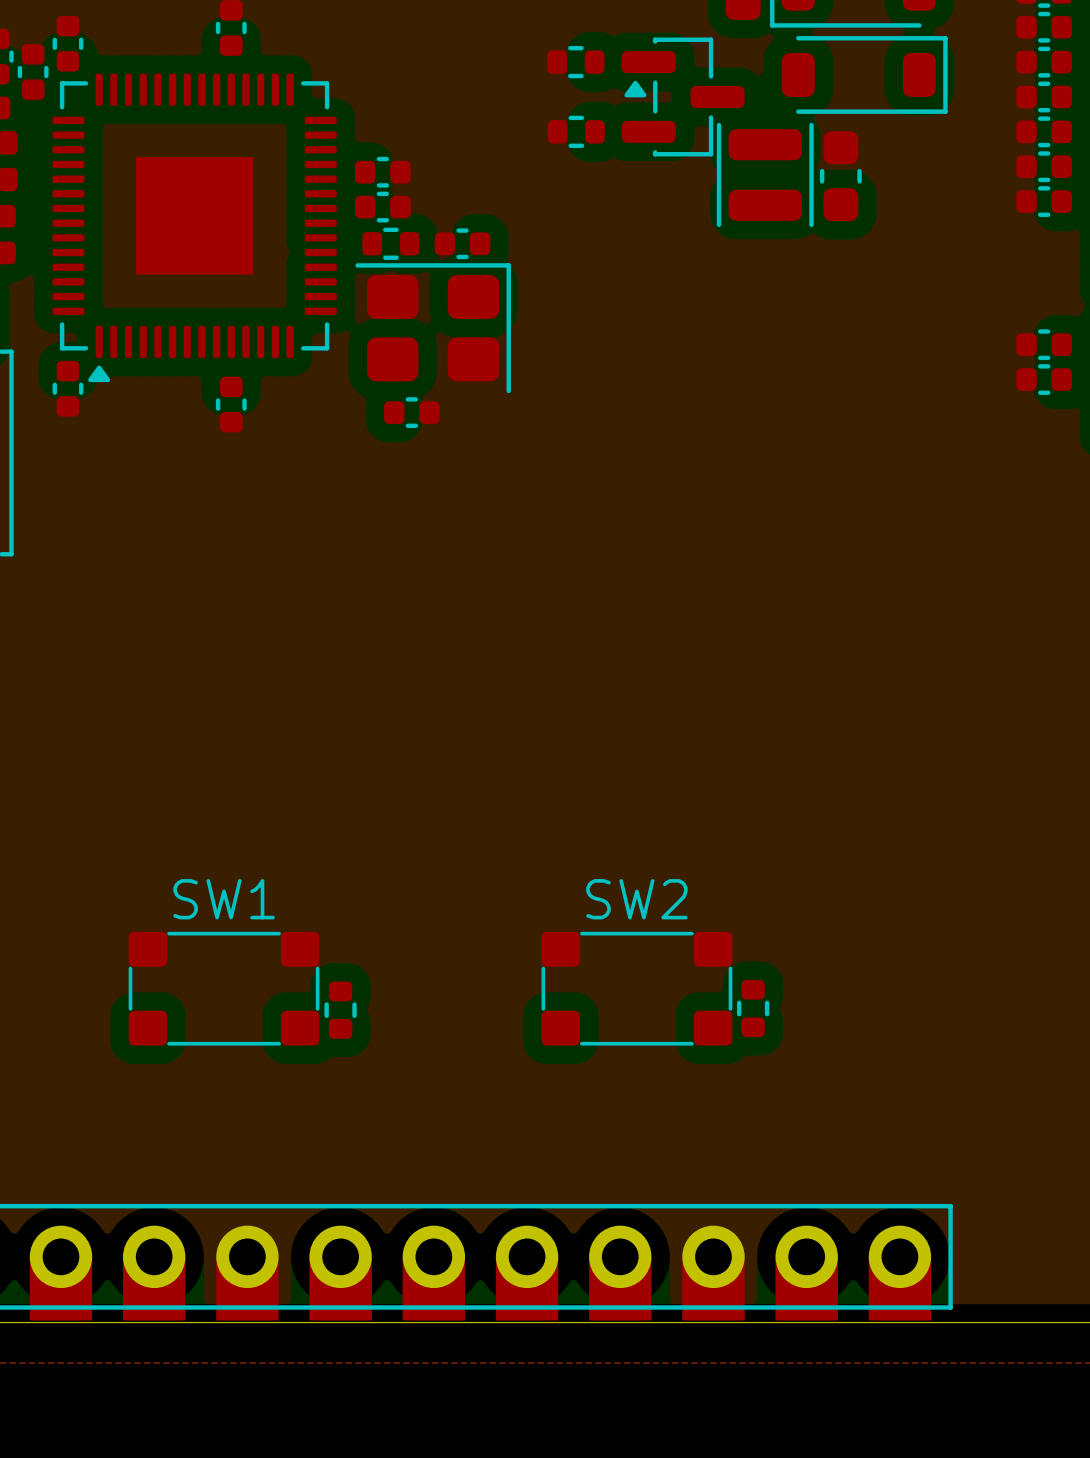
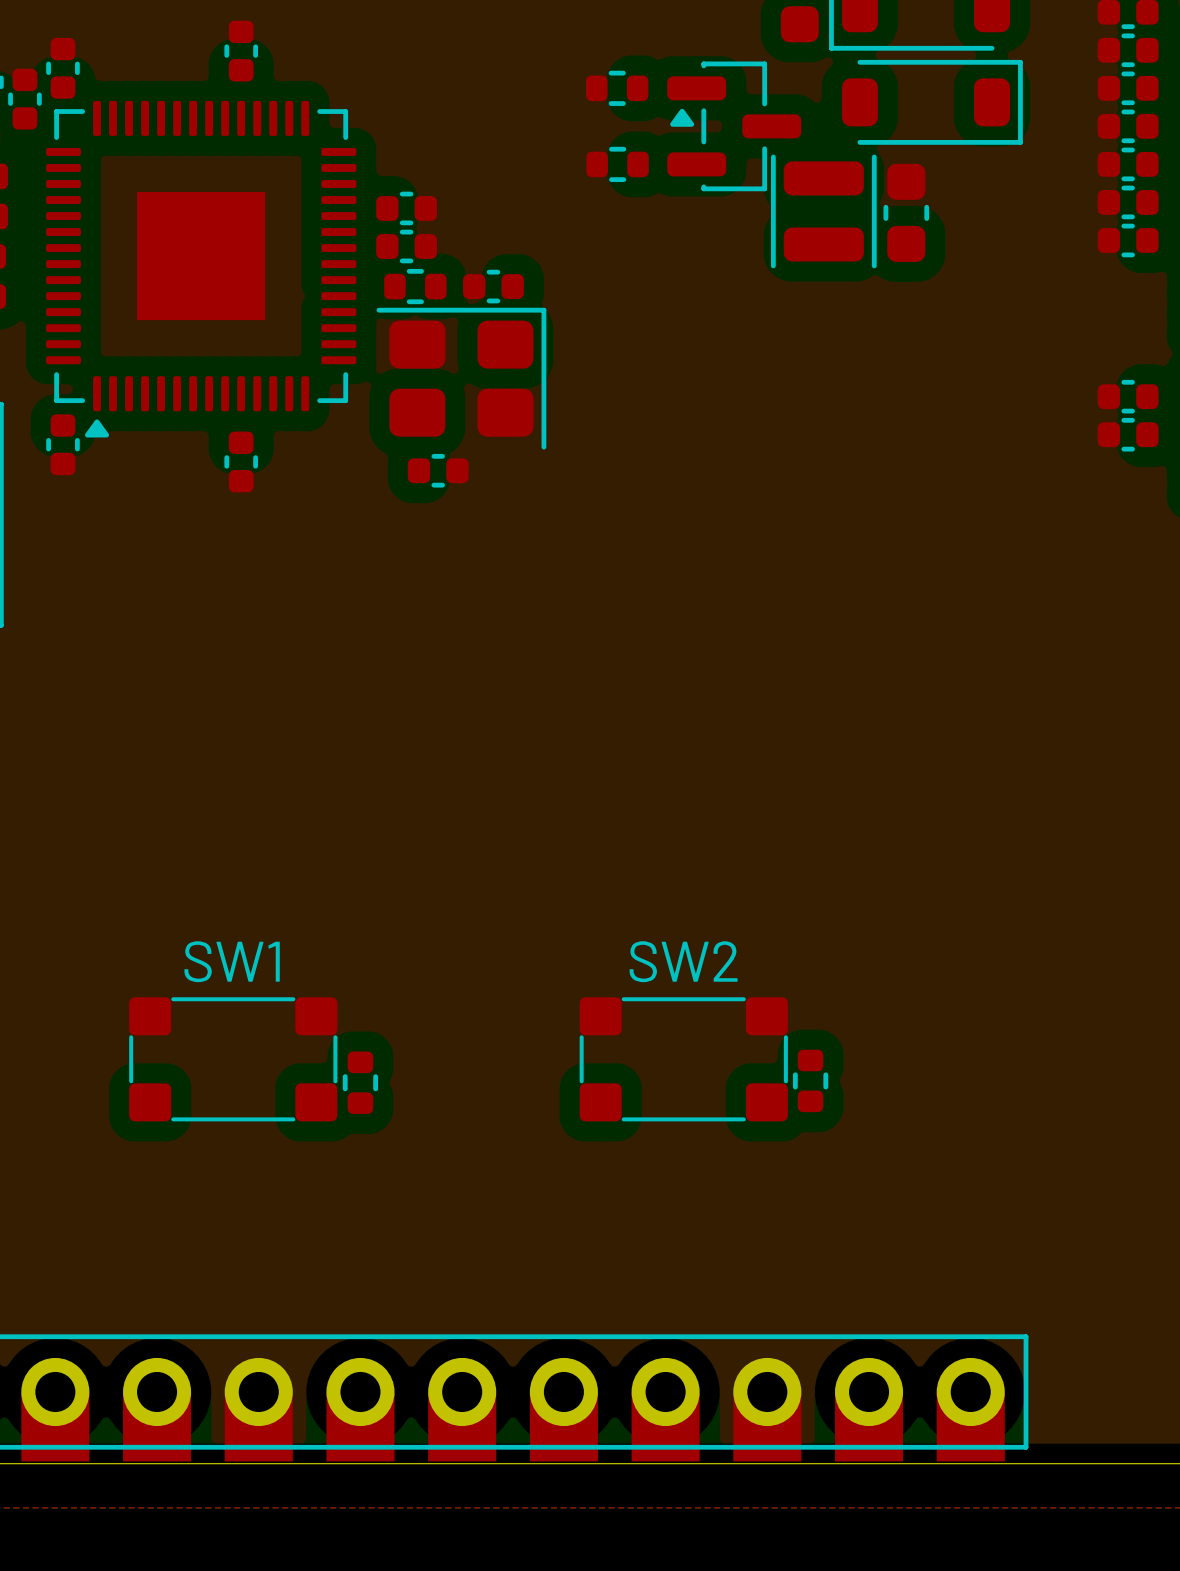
SW1 position: (224, 988) -> (233, 1059)
SW2 position: (636, 988) -> (683, 1059)
part position: (753, 1008) -> (810, 1080)
part position: (340, 1010) -> (360, 1082)

